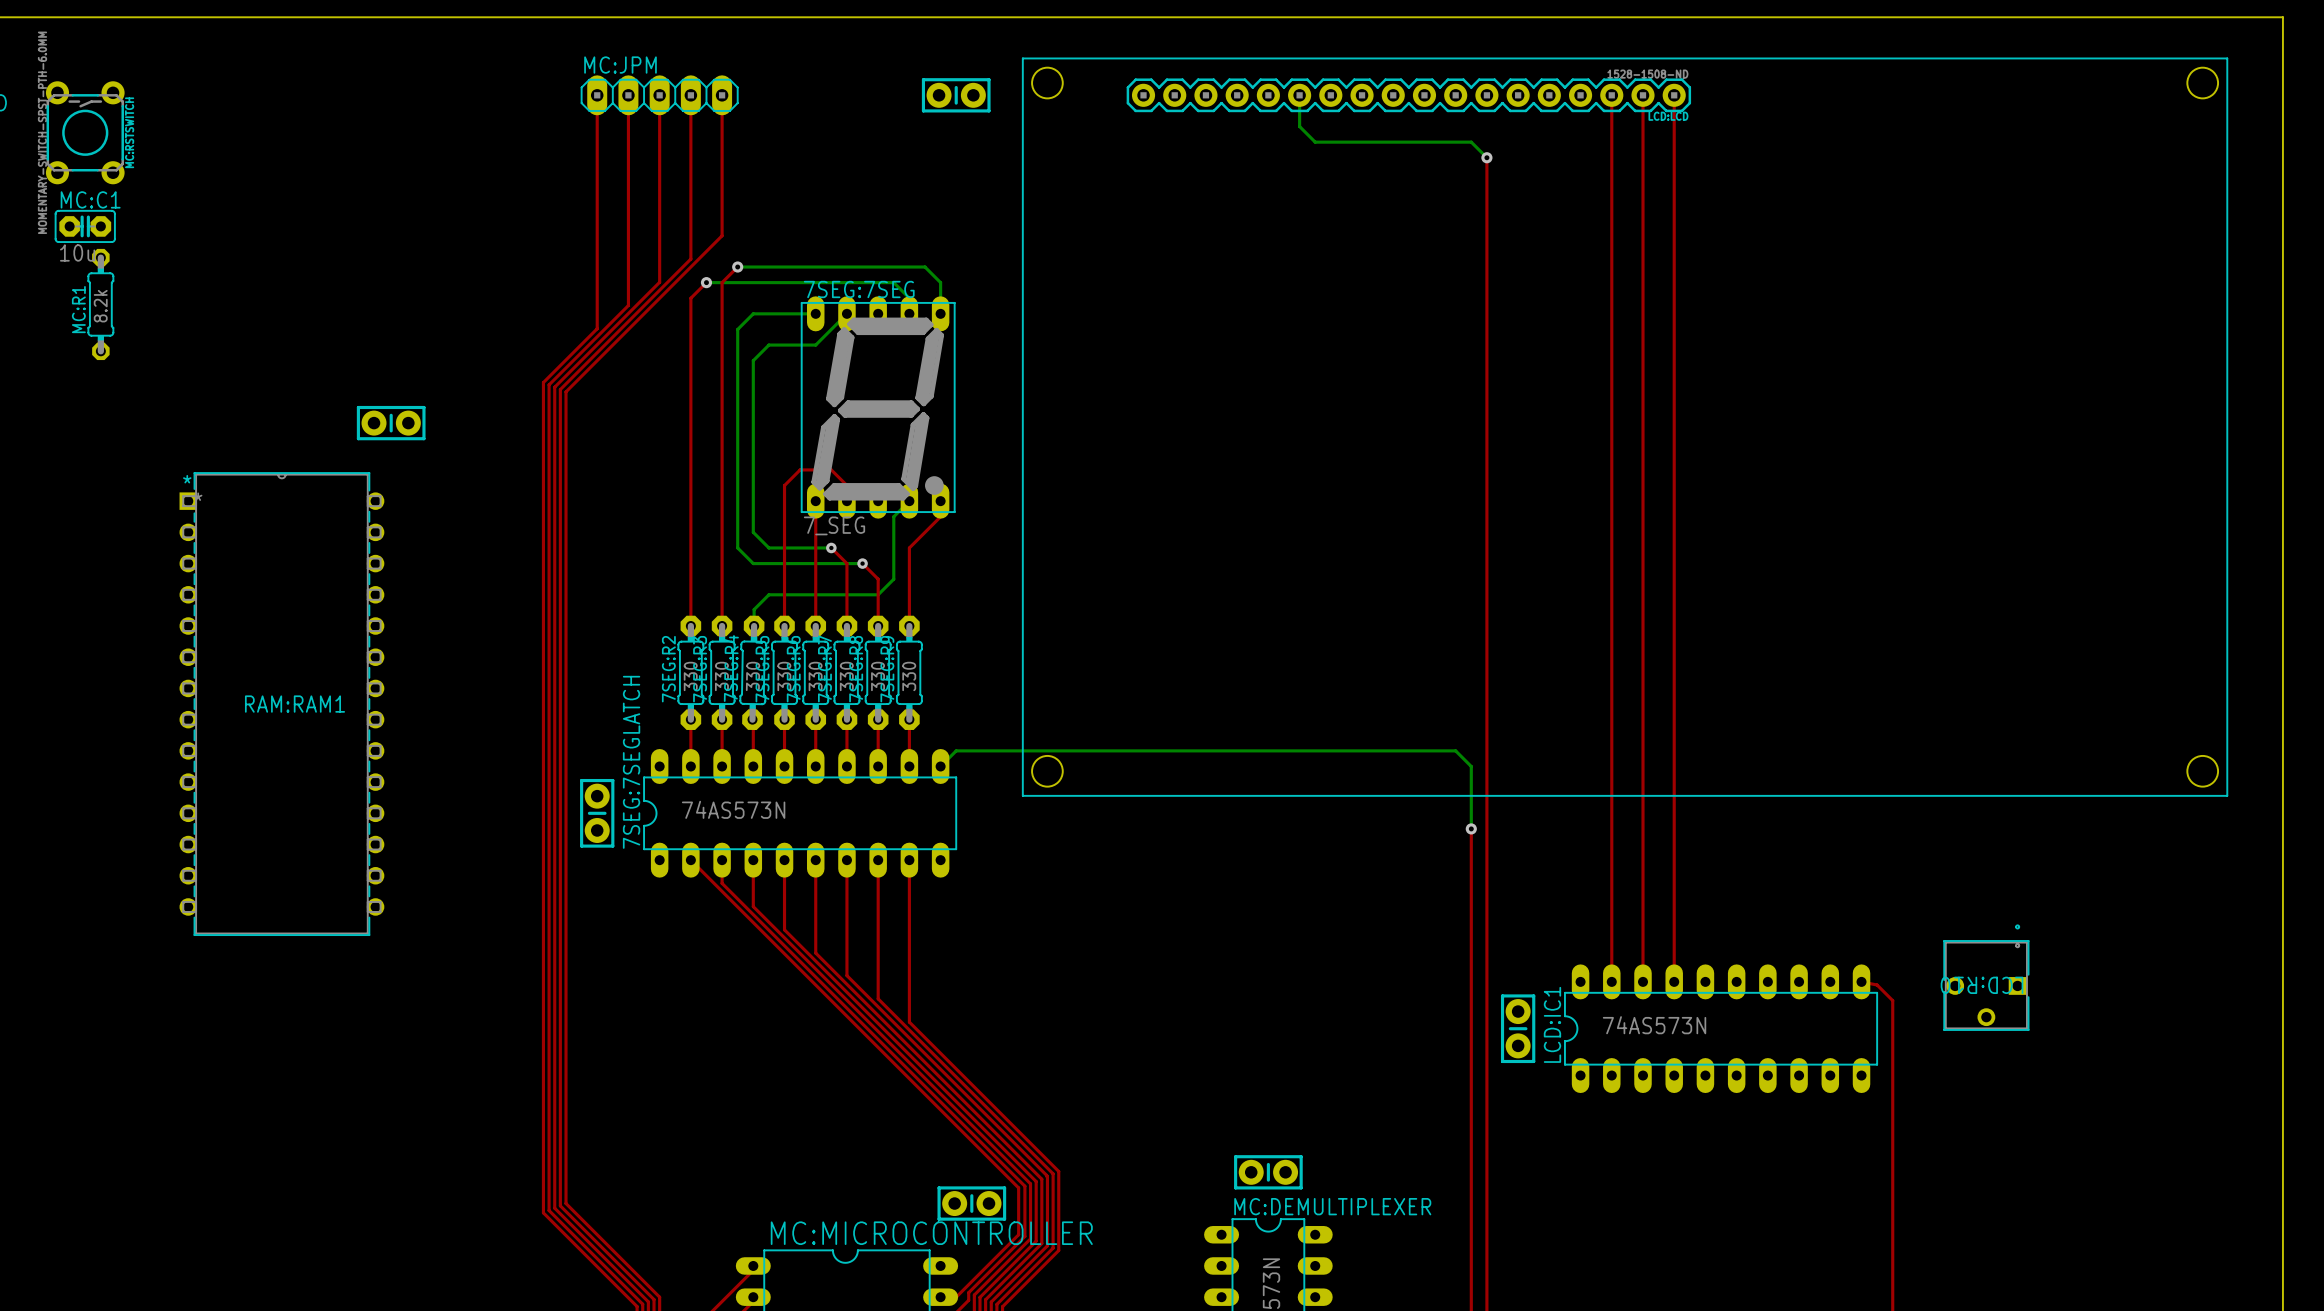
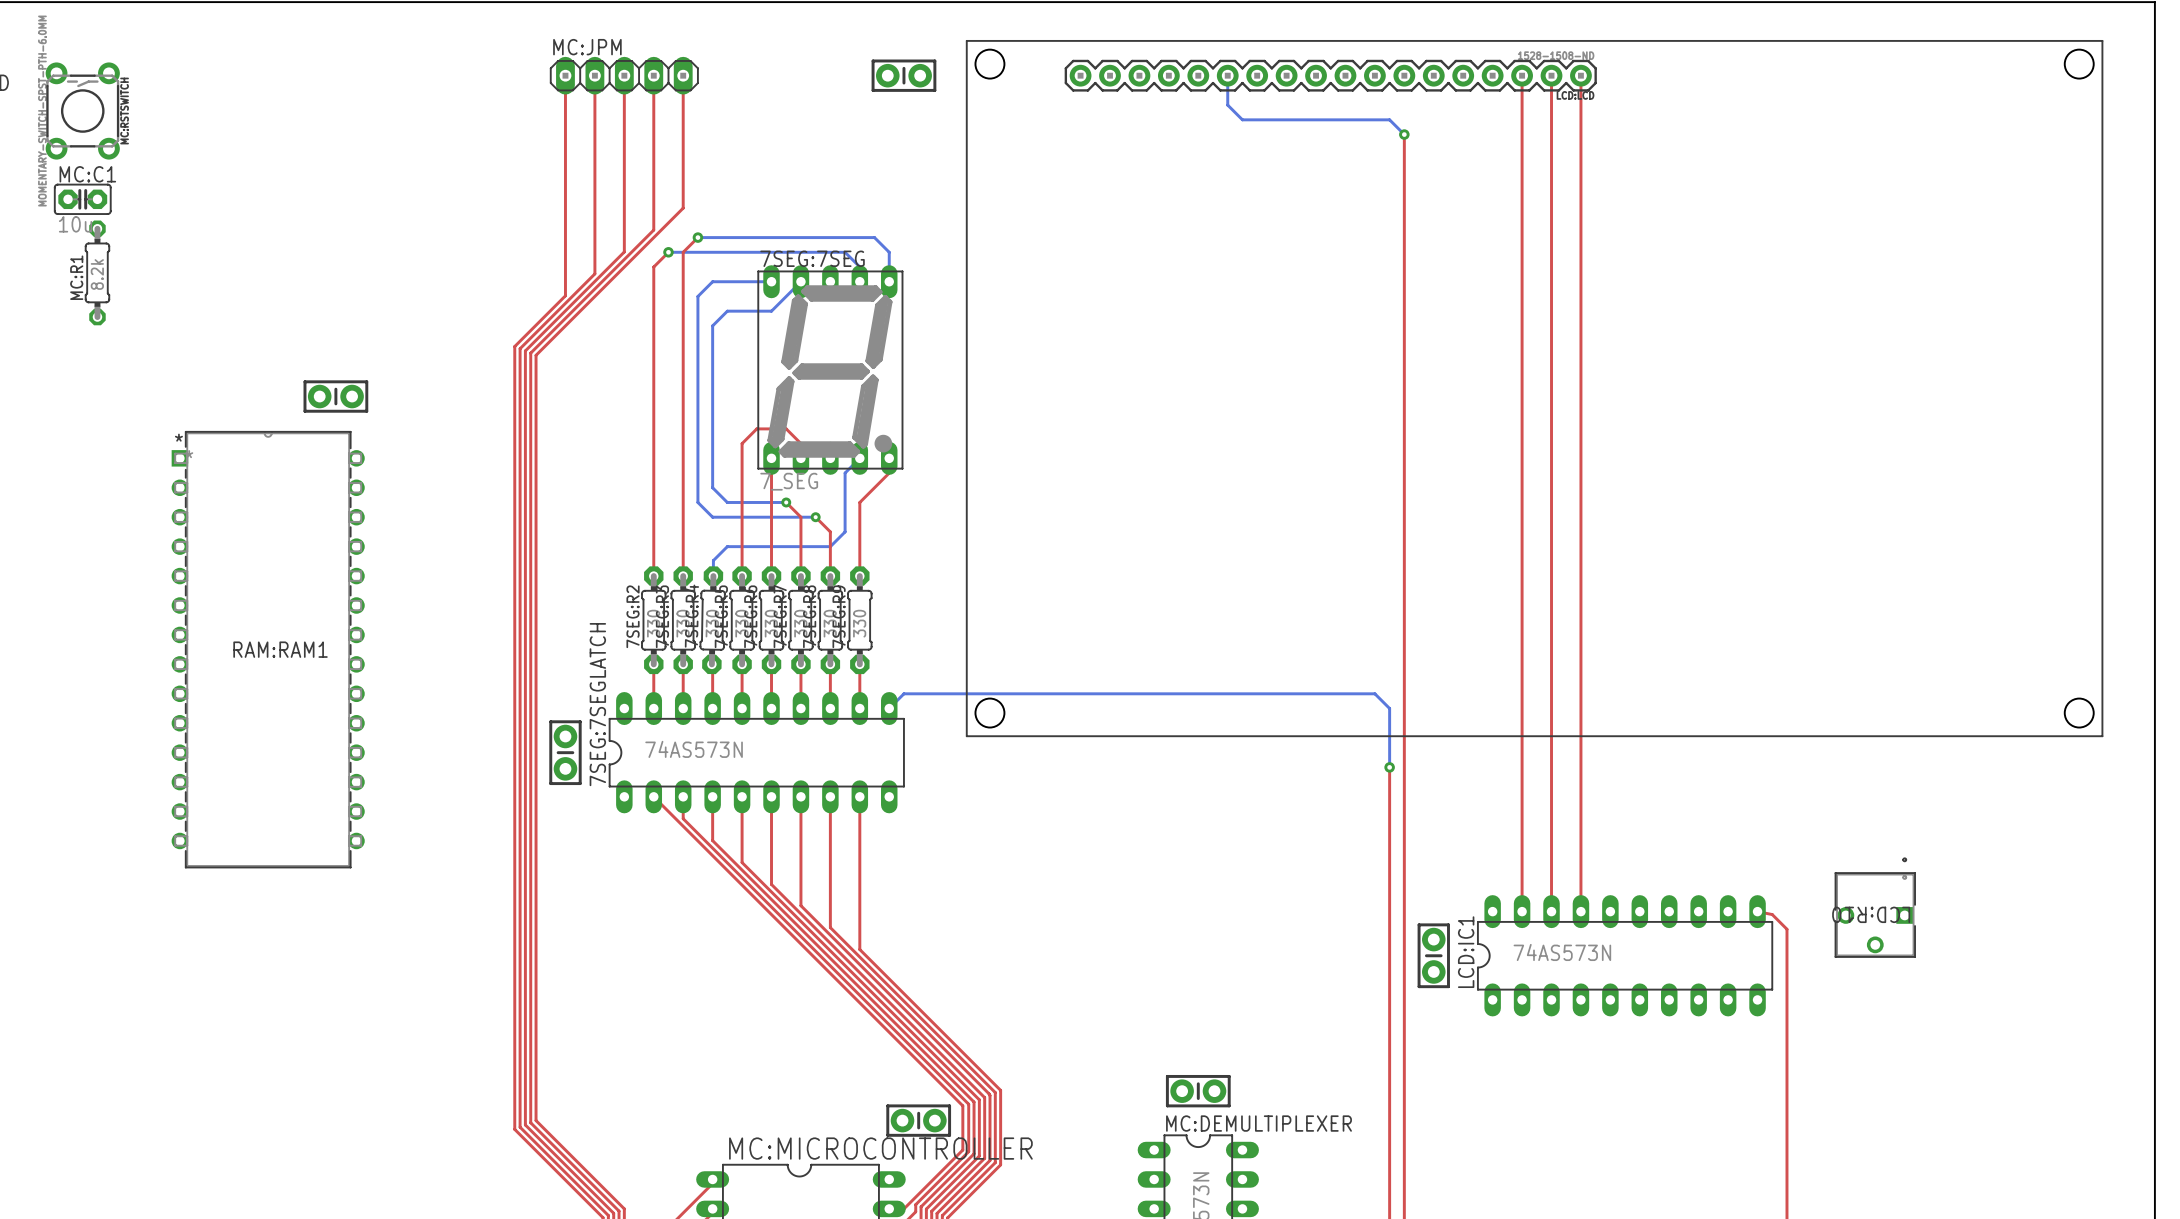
part position: (391, 423) -> (335, 396)

